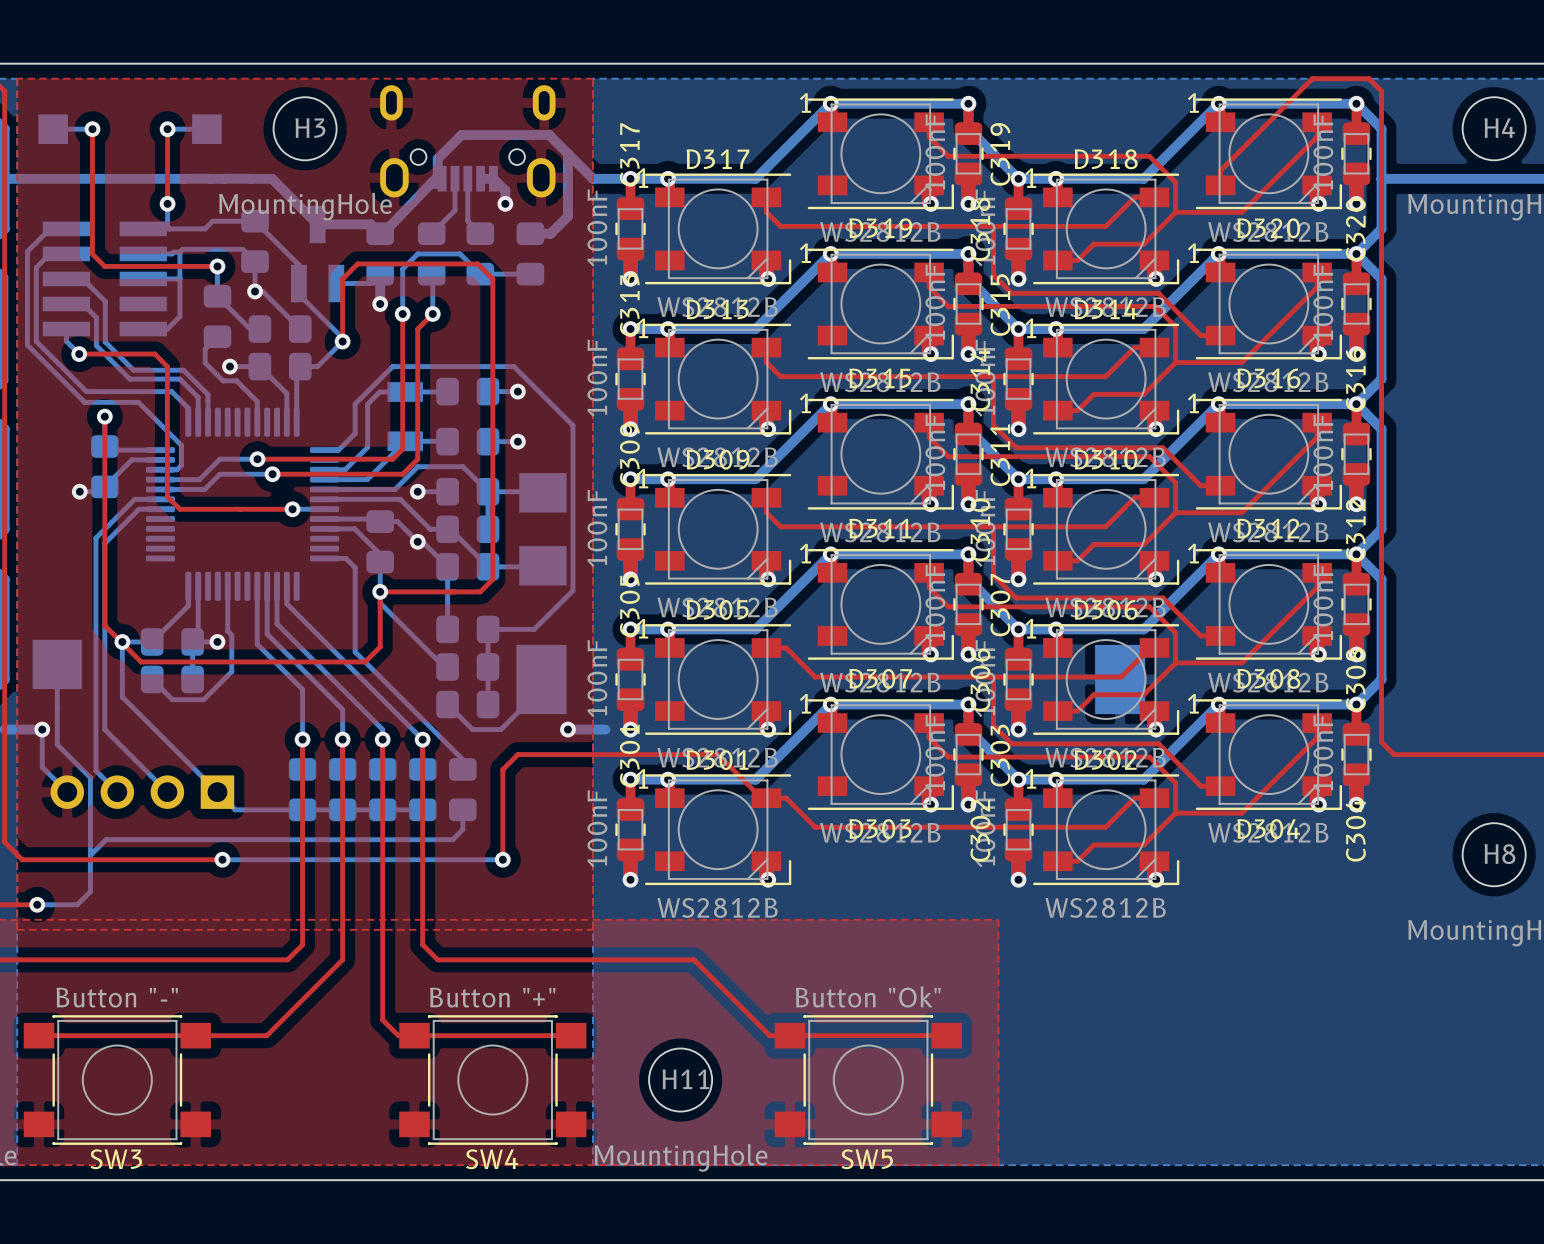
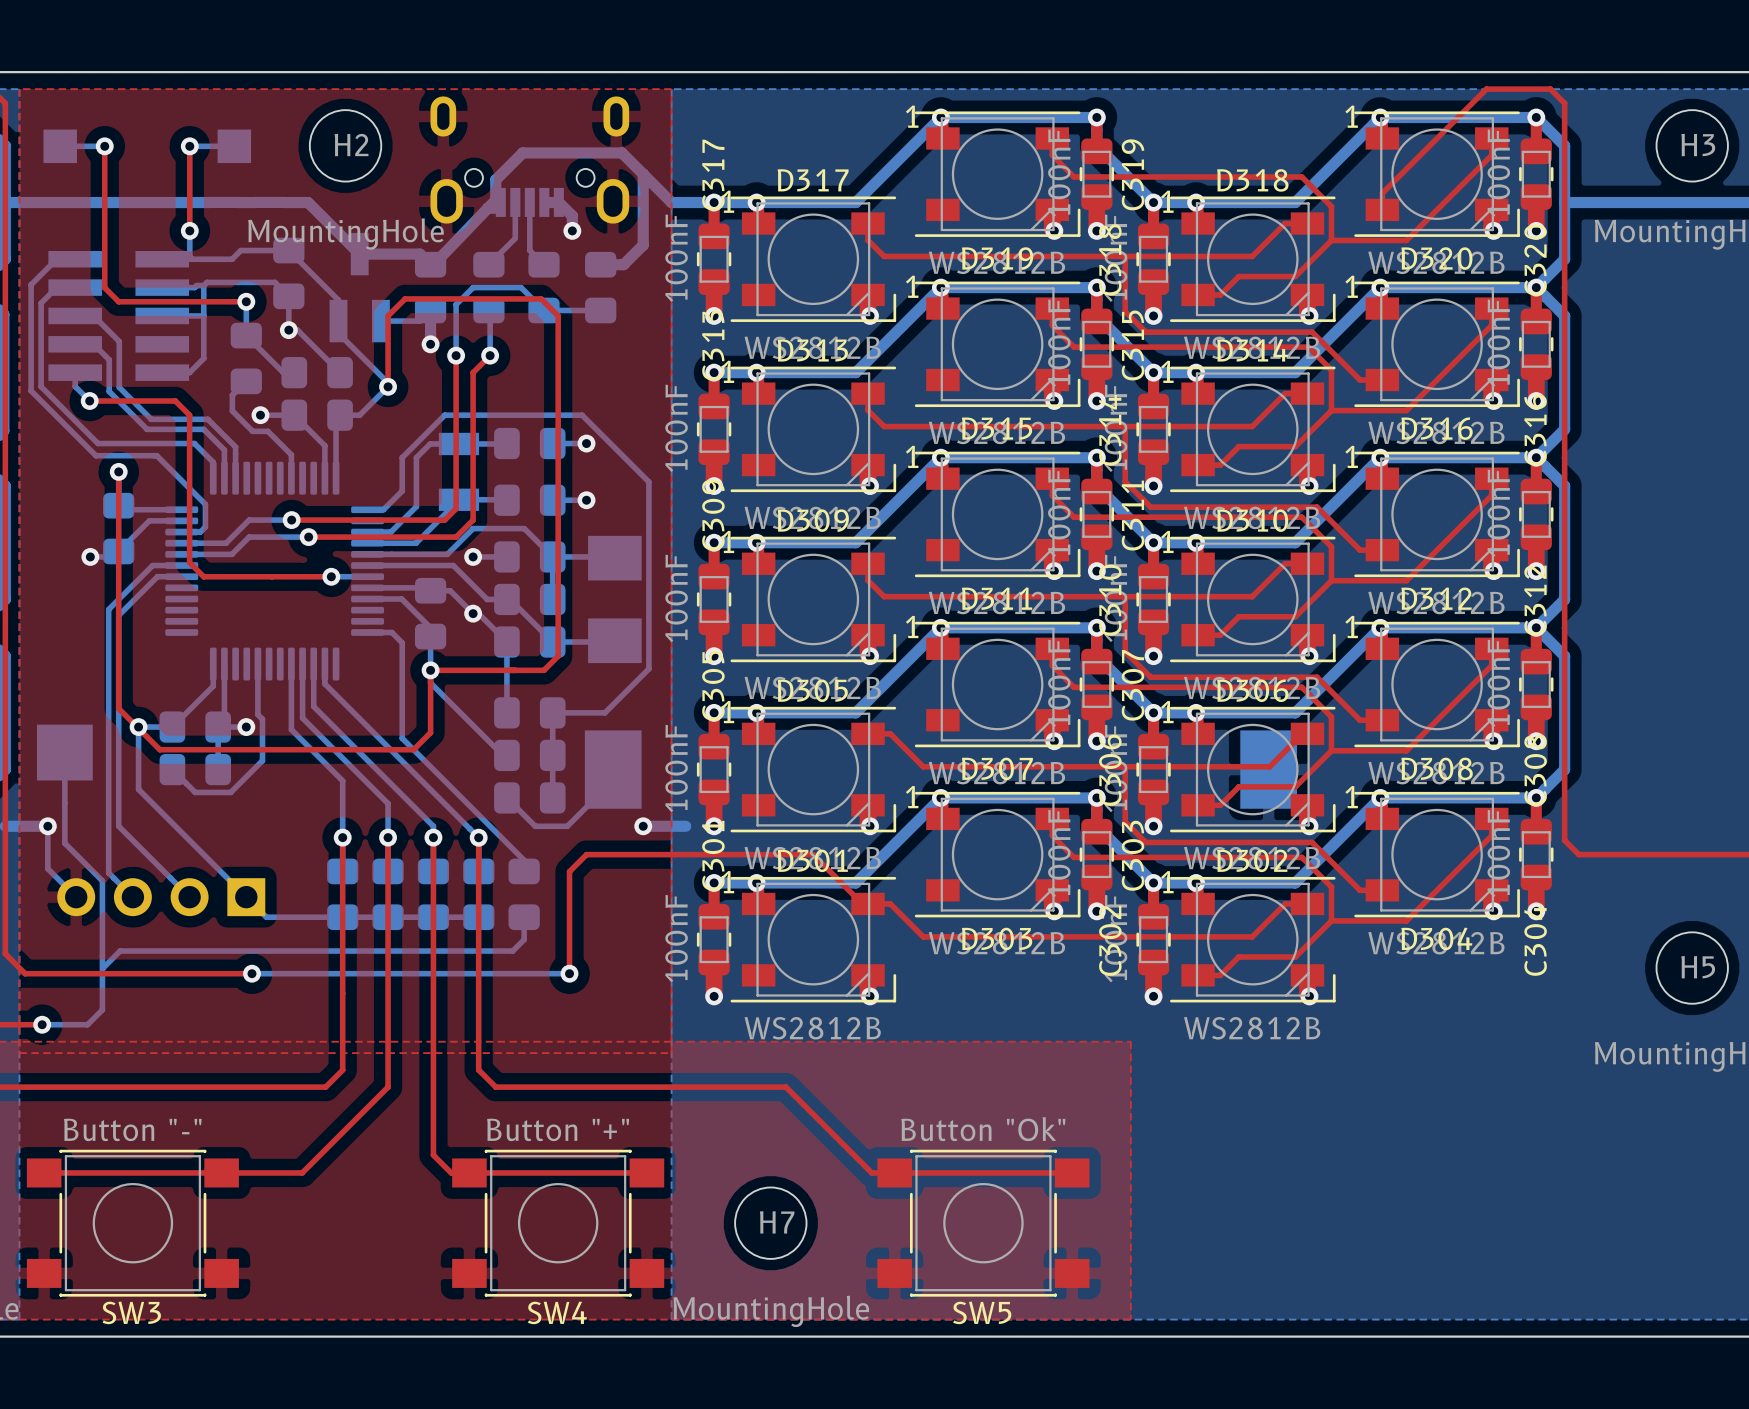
H3 name: H3 (310, 128) -> H2 (351, 145)
H4 name: H4 (1499, 128) -> H3 (1698, 145)
H8 name: H8 (1499, 854) -> H5 (1698, 967)
H11 name: H11 (685, 1079) -> H7 (777, 1222)

